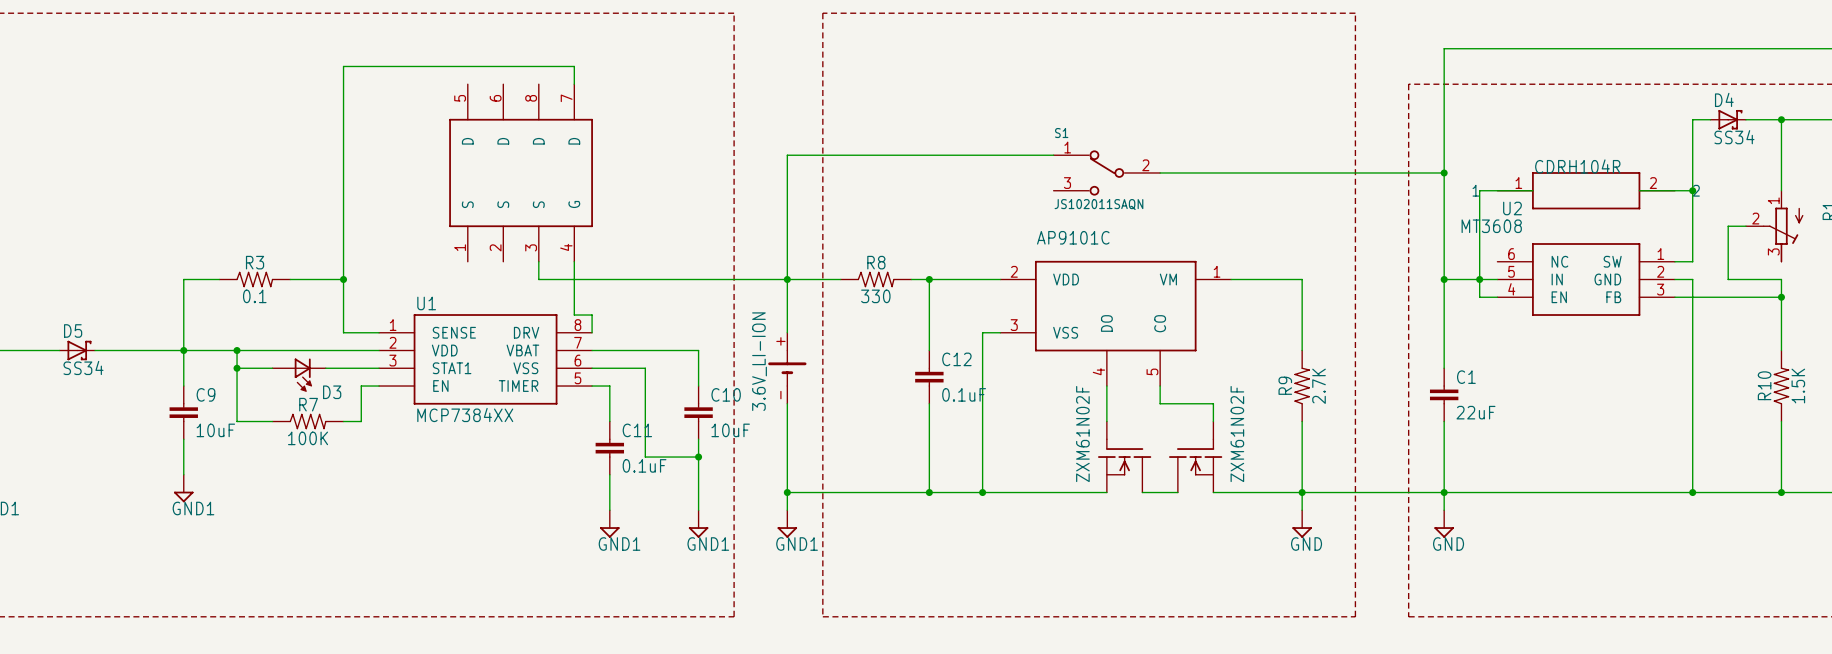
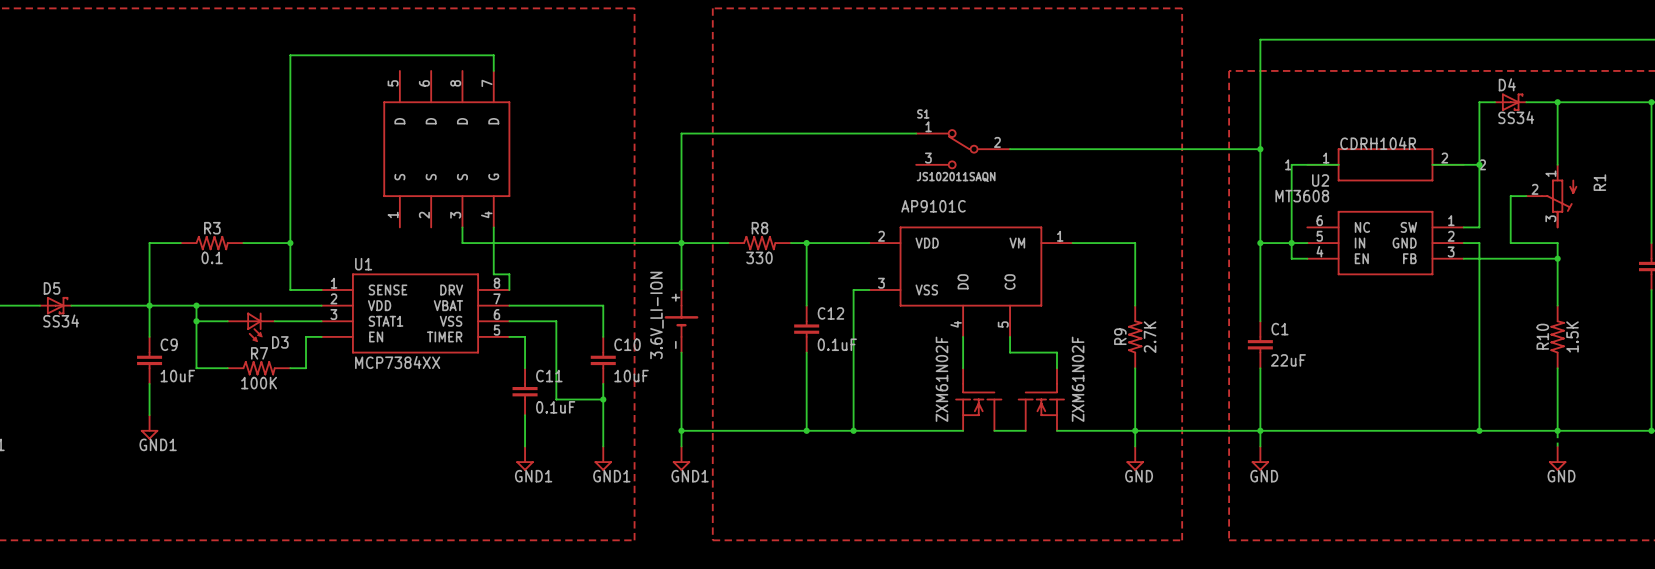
wire: none -> (1557, 430) (1557, 446)
power symbol: none -> GND (1557, 458)

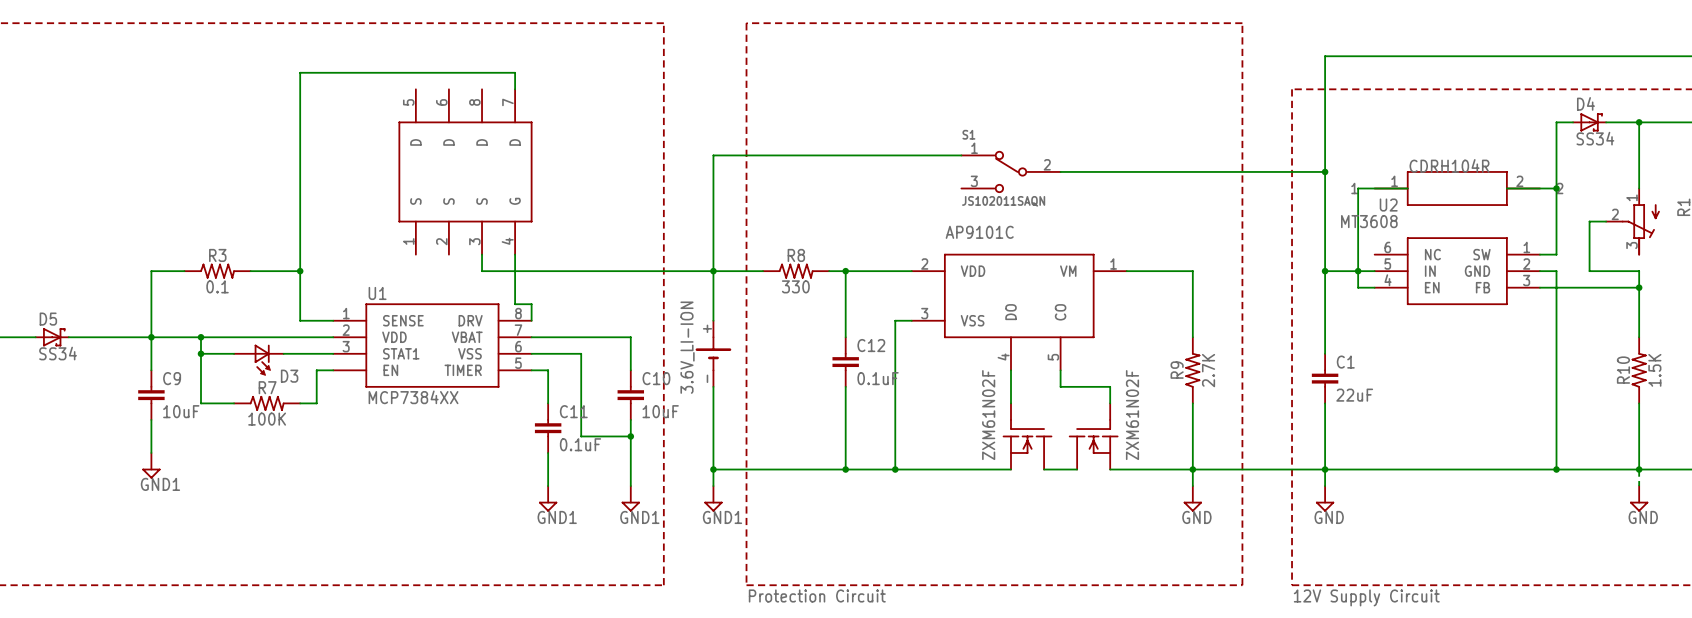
text: none -> Protection Circuit (817, 595)
text: none -> 12V Supply Circuit (1366, 597)

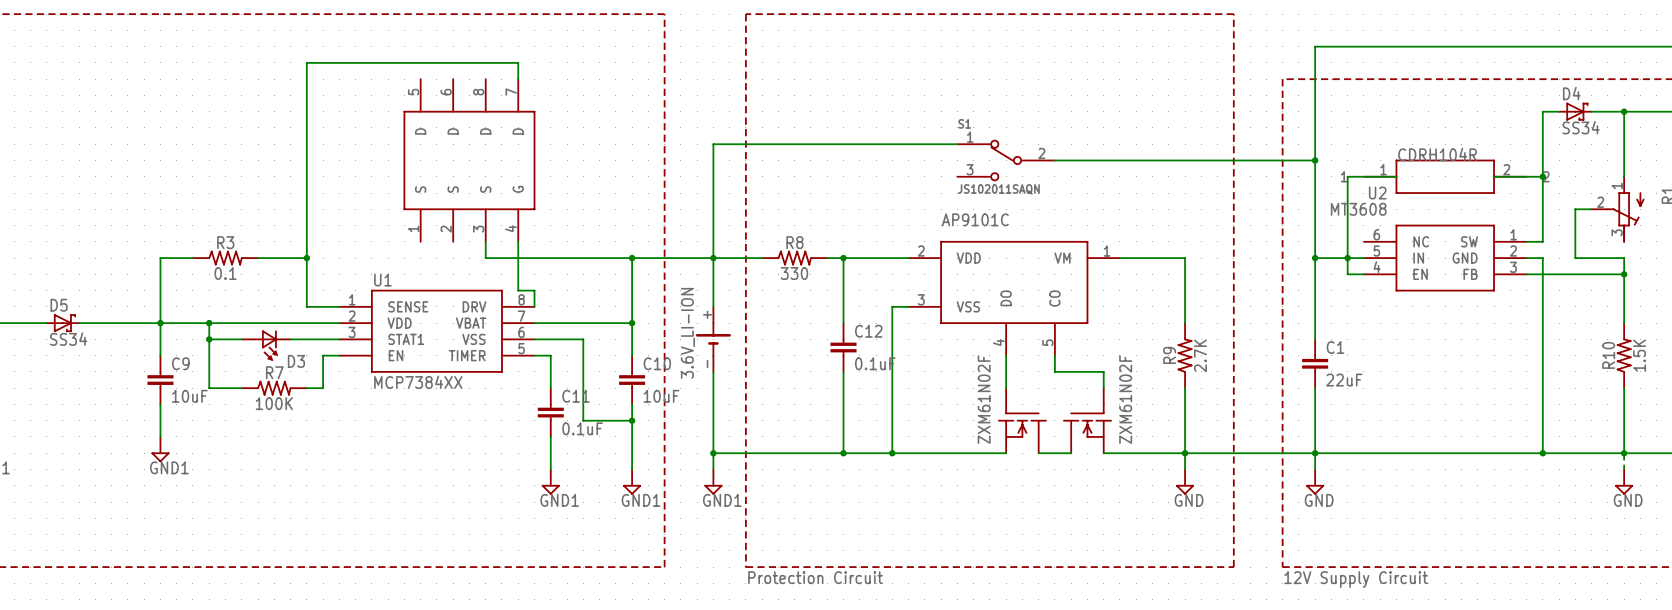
wire: none -> (632, 258) (632, 323)
junction: none -> (632, 258)
junction: none -> (632, 323)

